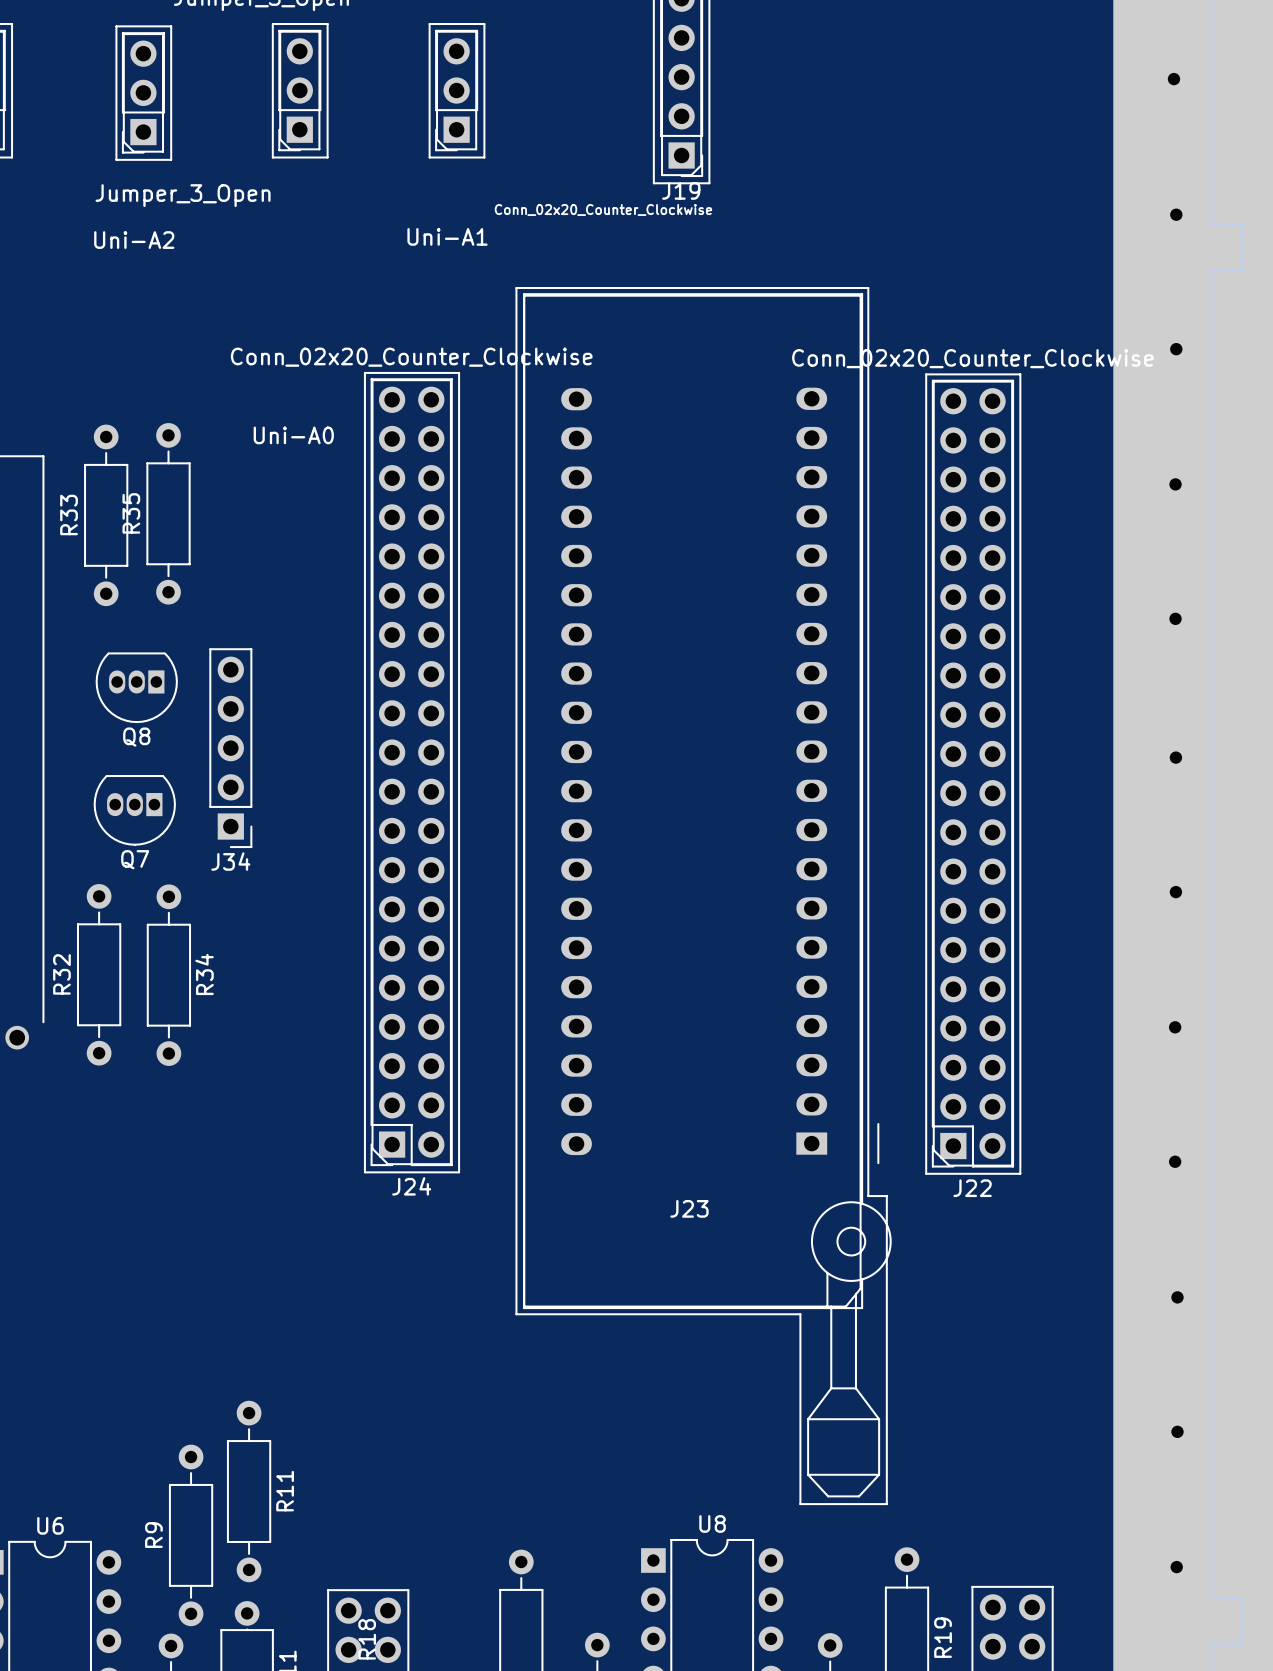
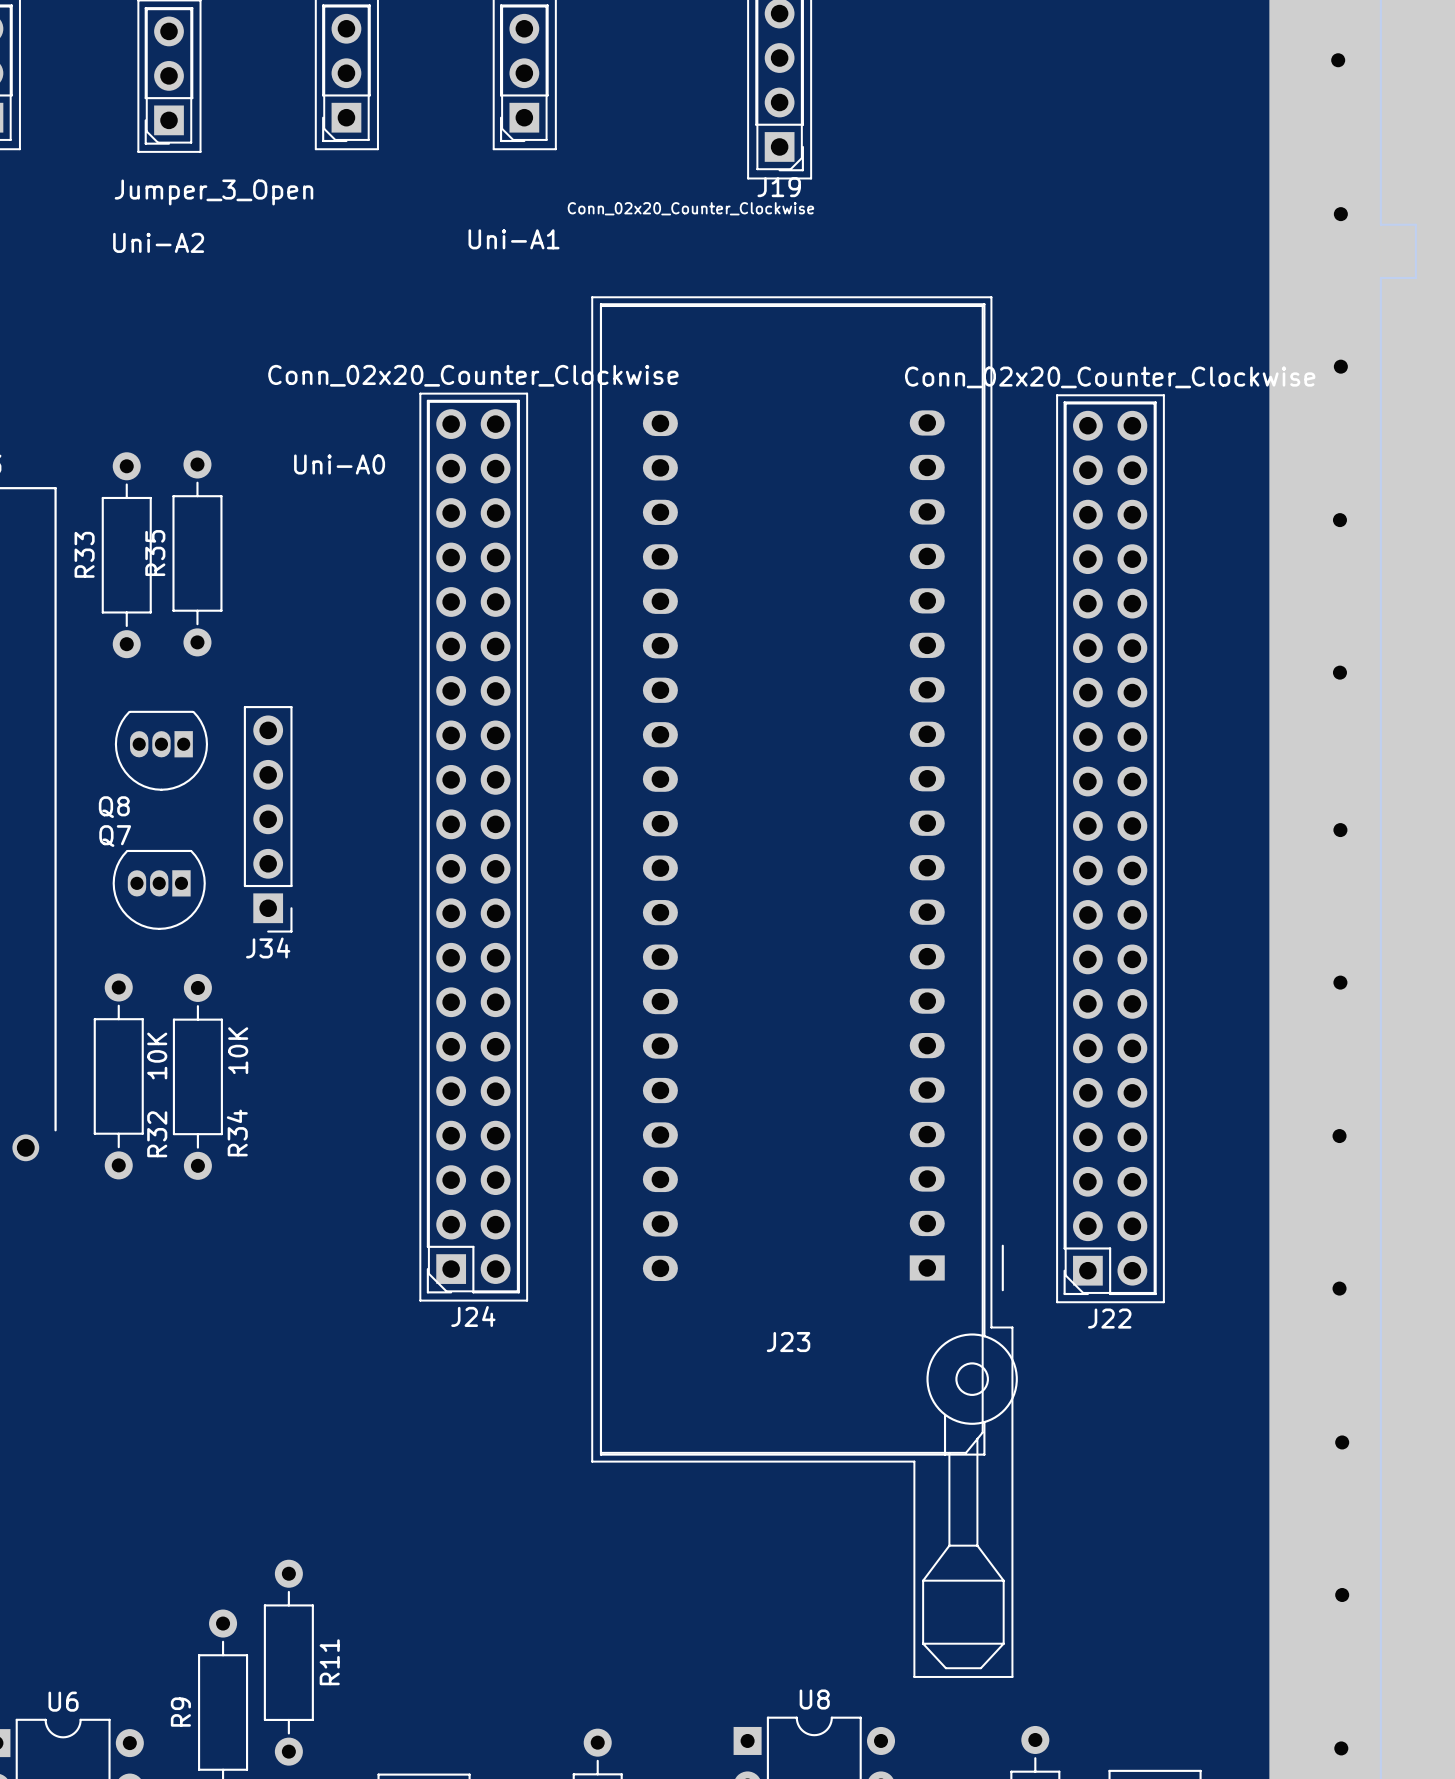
Q8 name position: Q8 (136, 737) -> Q8 (114, 807)
Q7 name position: Q7 (135, 859) -> Q7 (115, 836)
R34 value: none -> 10K (238, 1050)
R32 value: none -> 10K (157, 1055)
R32 name position: R32 (61, 974) -> R32 (157, 1134)
R34 name position: R34 (204, 974) -> R34 (237, 1132)

